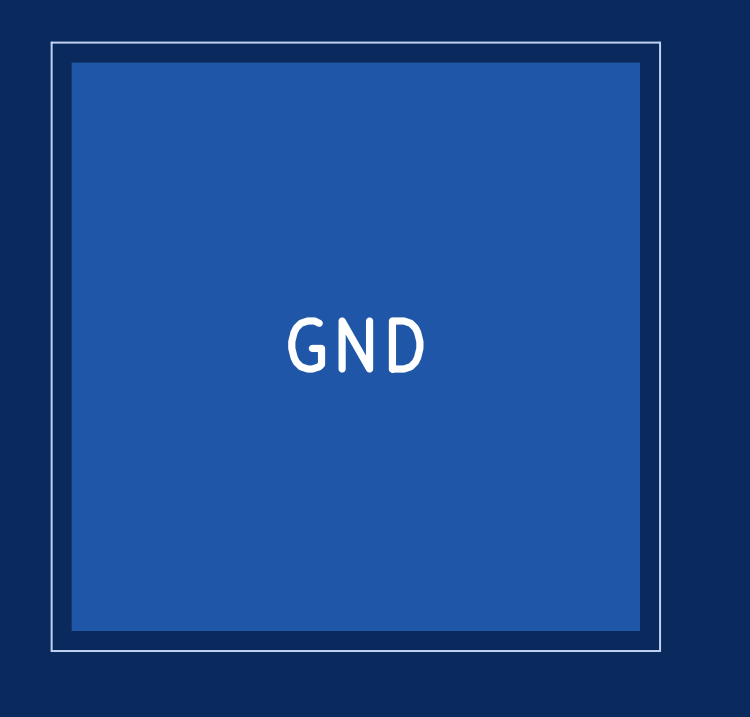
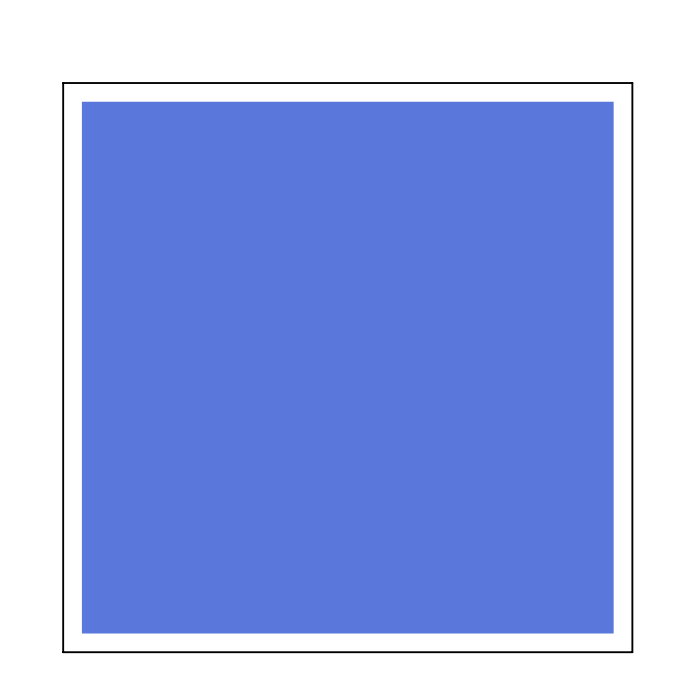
text: GND (355, 345) -> none

